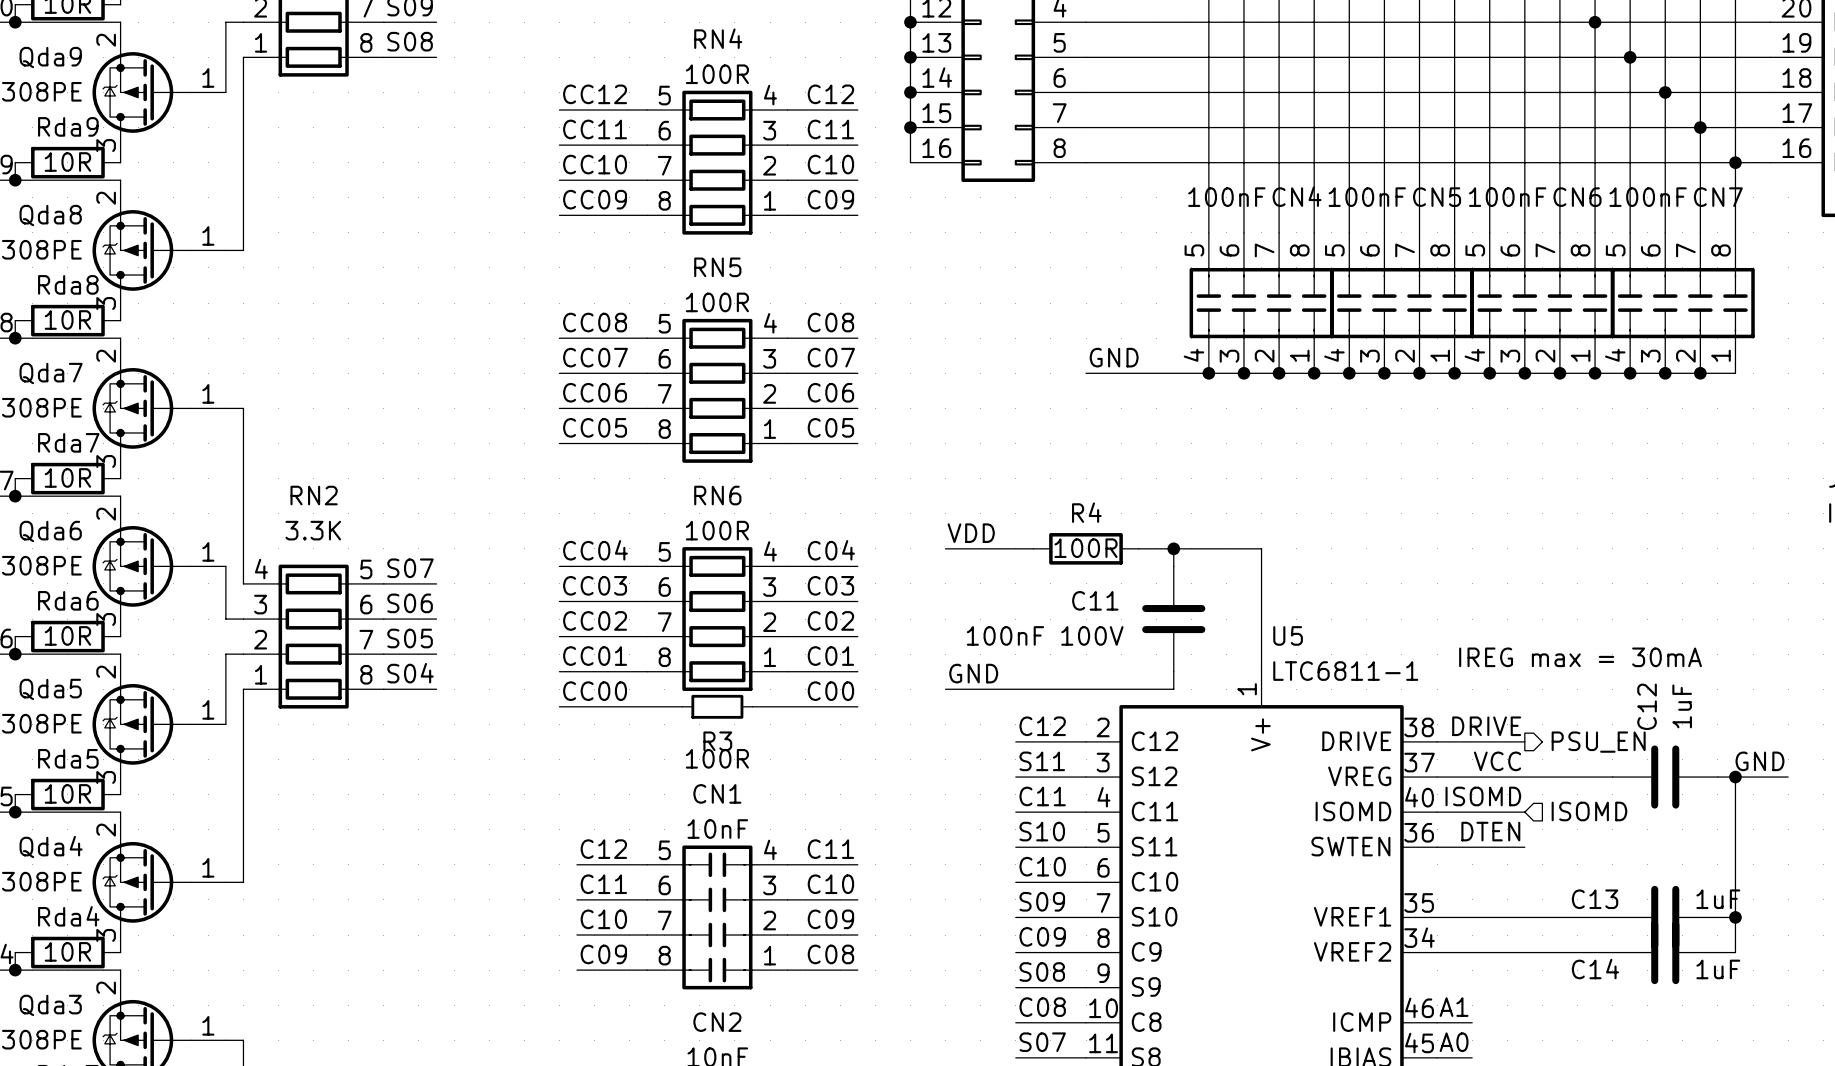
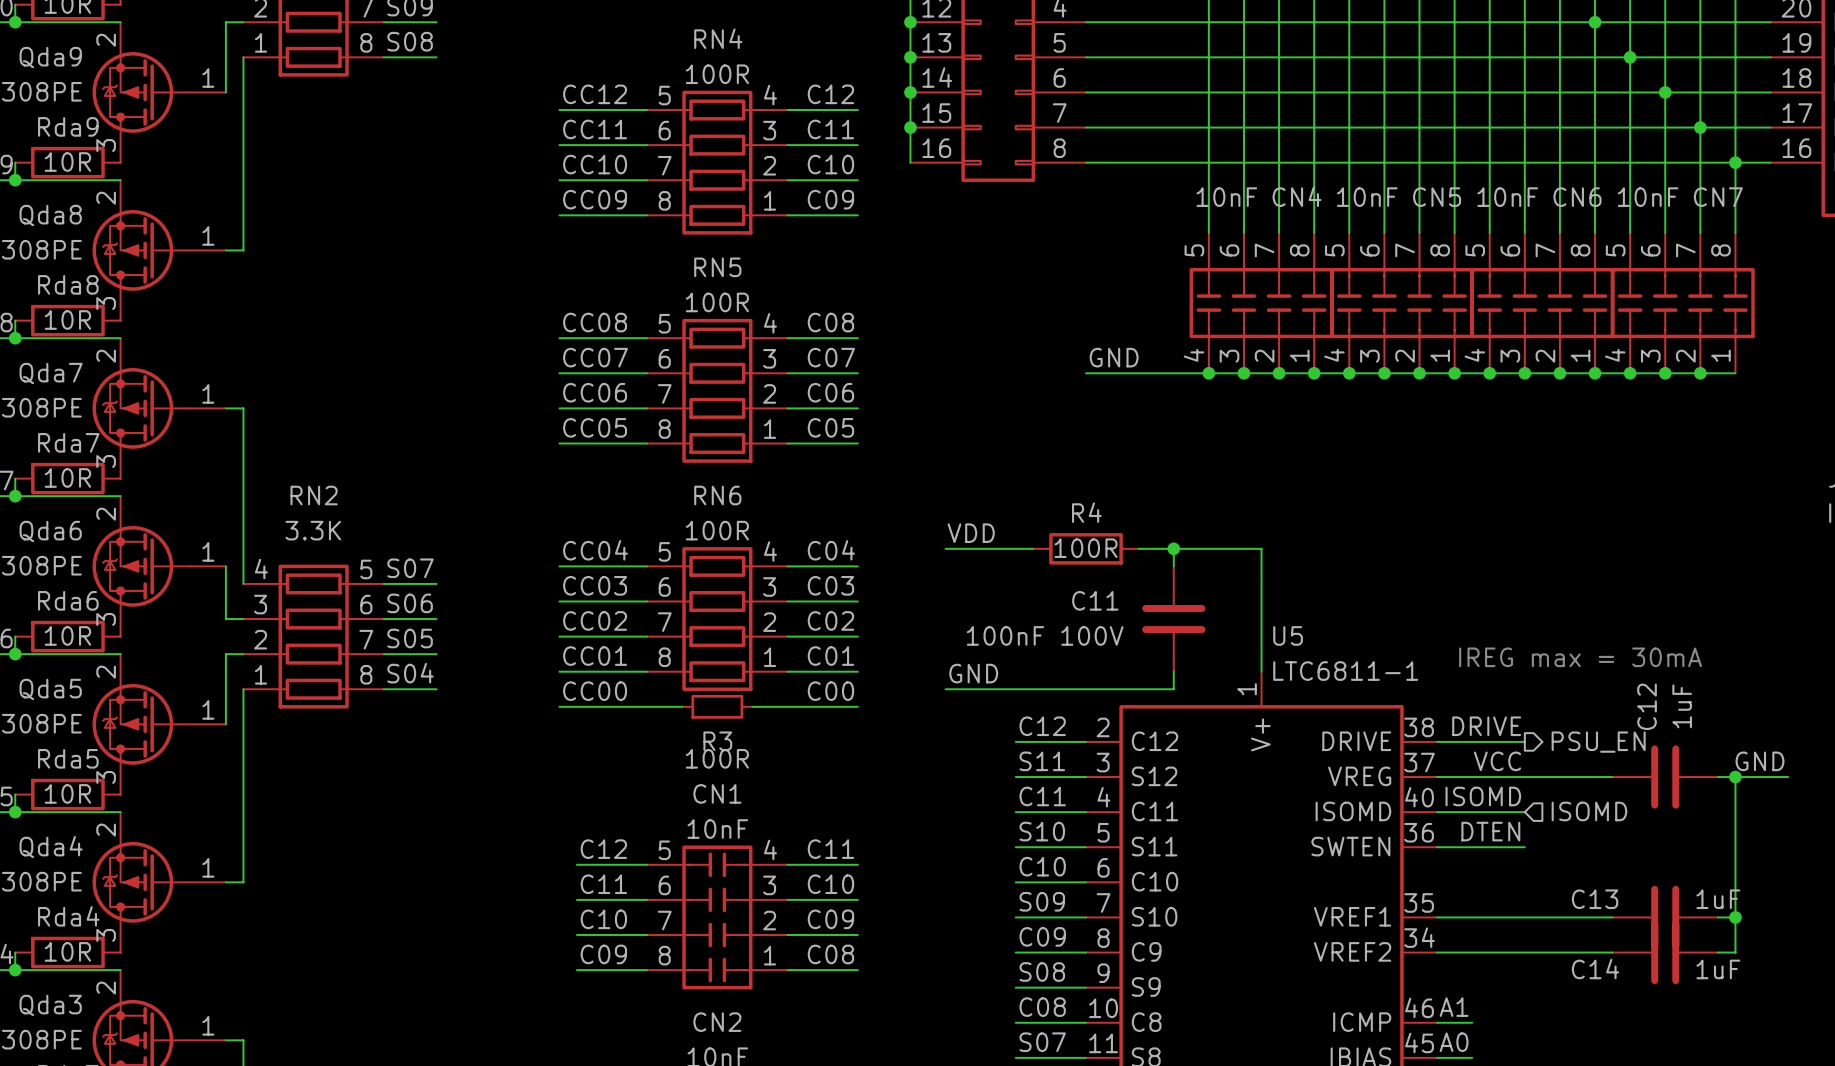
CN4 value: 100nF (1226, 197) -> 10nF (1226, 197)
CN5 value: 100nF (1367, 197) -> 10nF (1367, 197)
CN6 value: 100nF (1507, 197) -> 10nF (1507, 197)
CN7 value: 100nF (1648, 197) -> 10nF (1648, 197)

